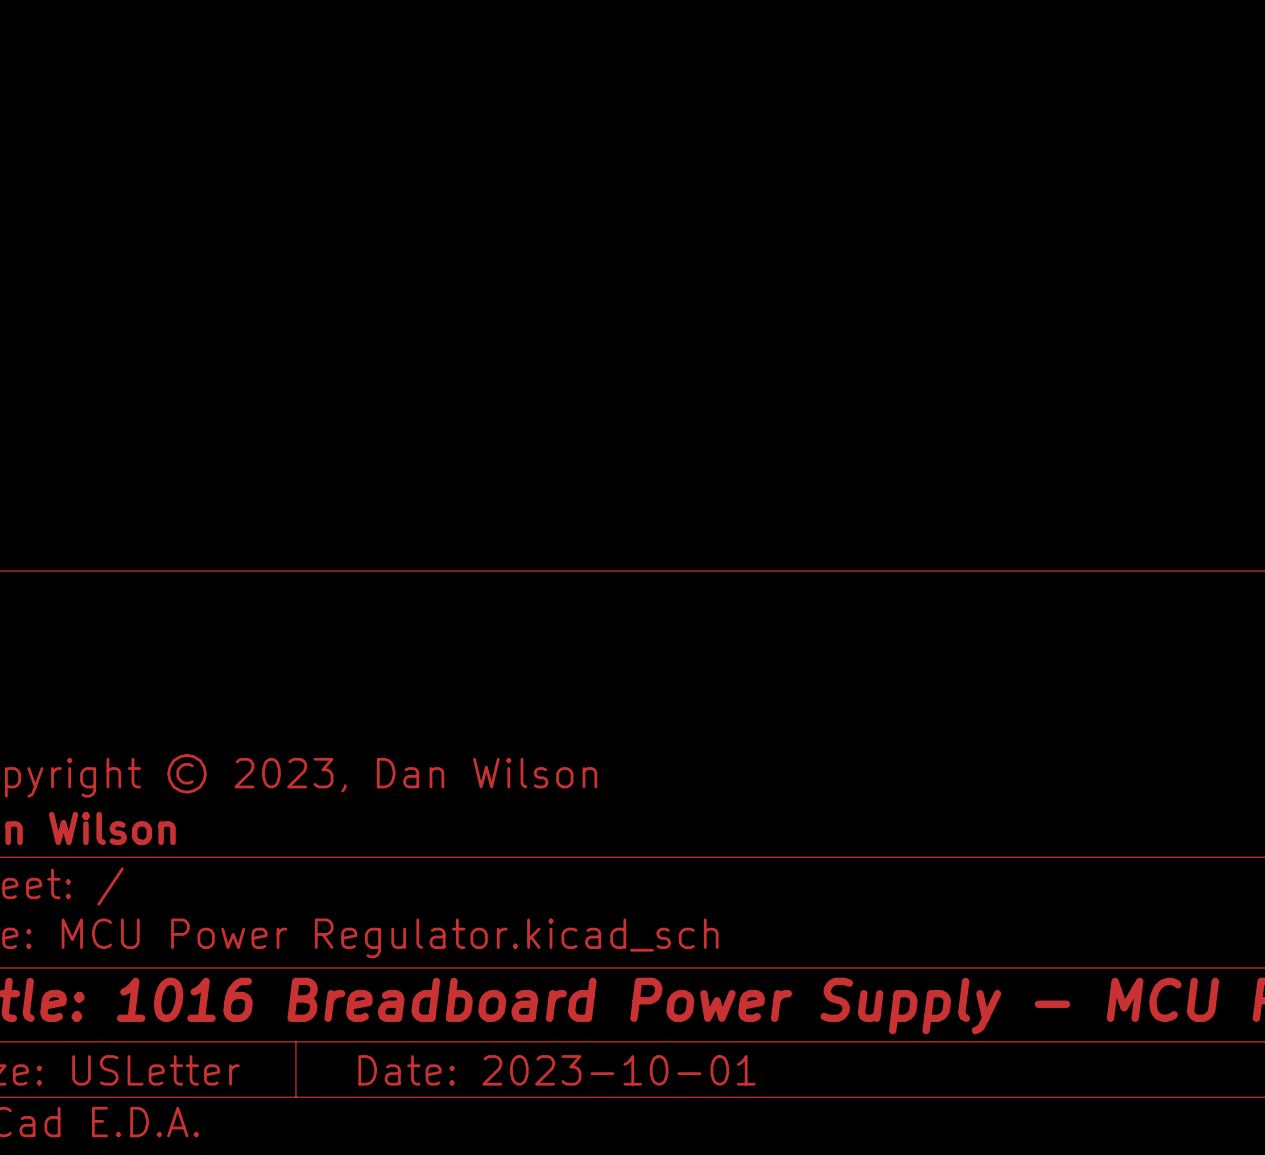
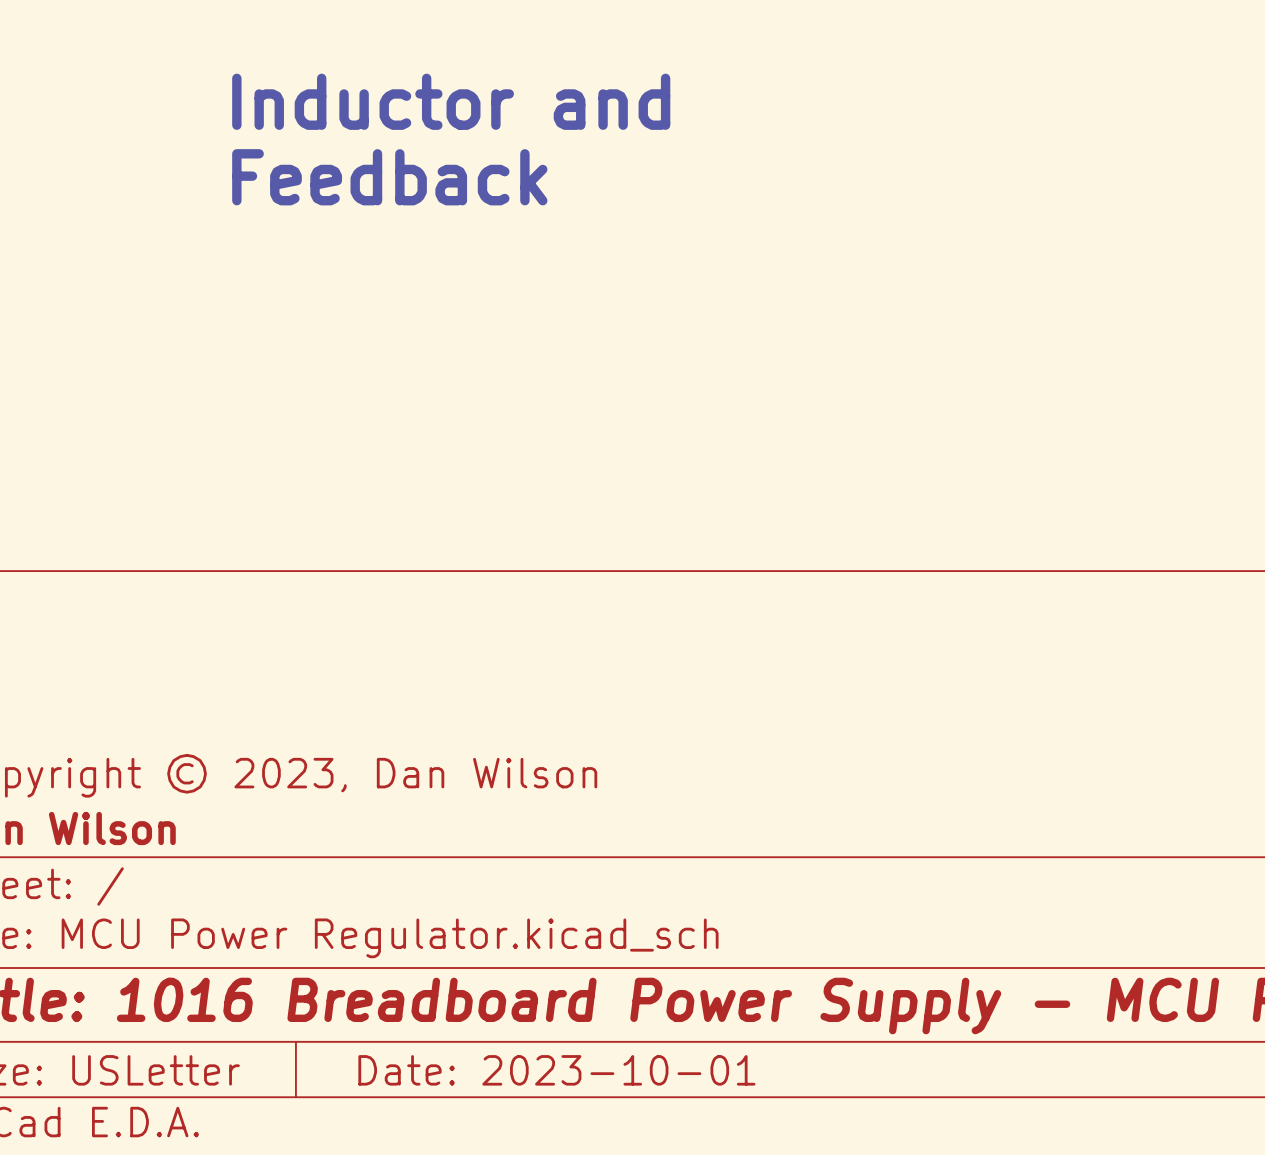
text: none -> Inductor and (451, 101)
text: none -> Feedback (389, 177)

